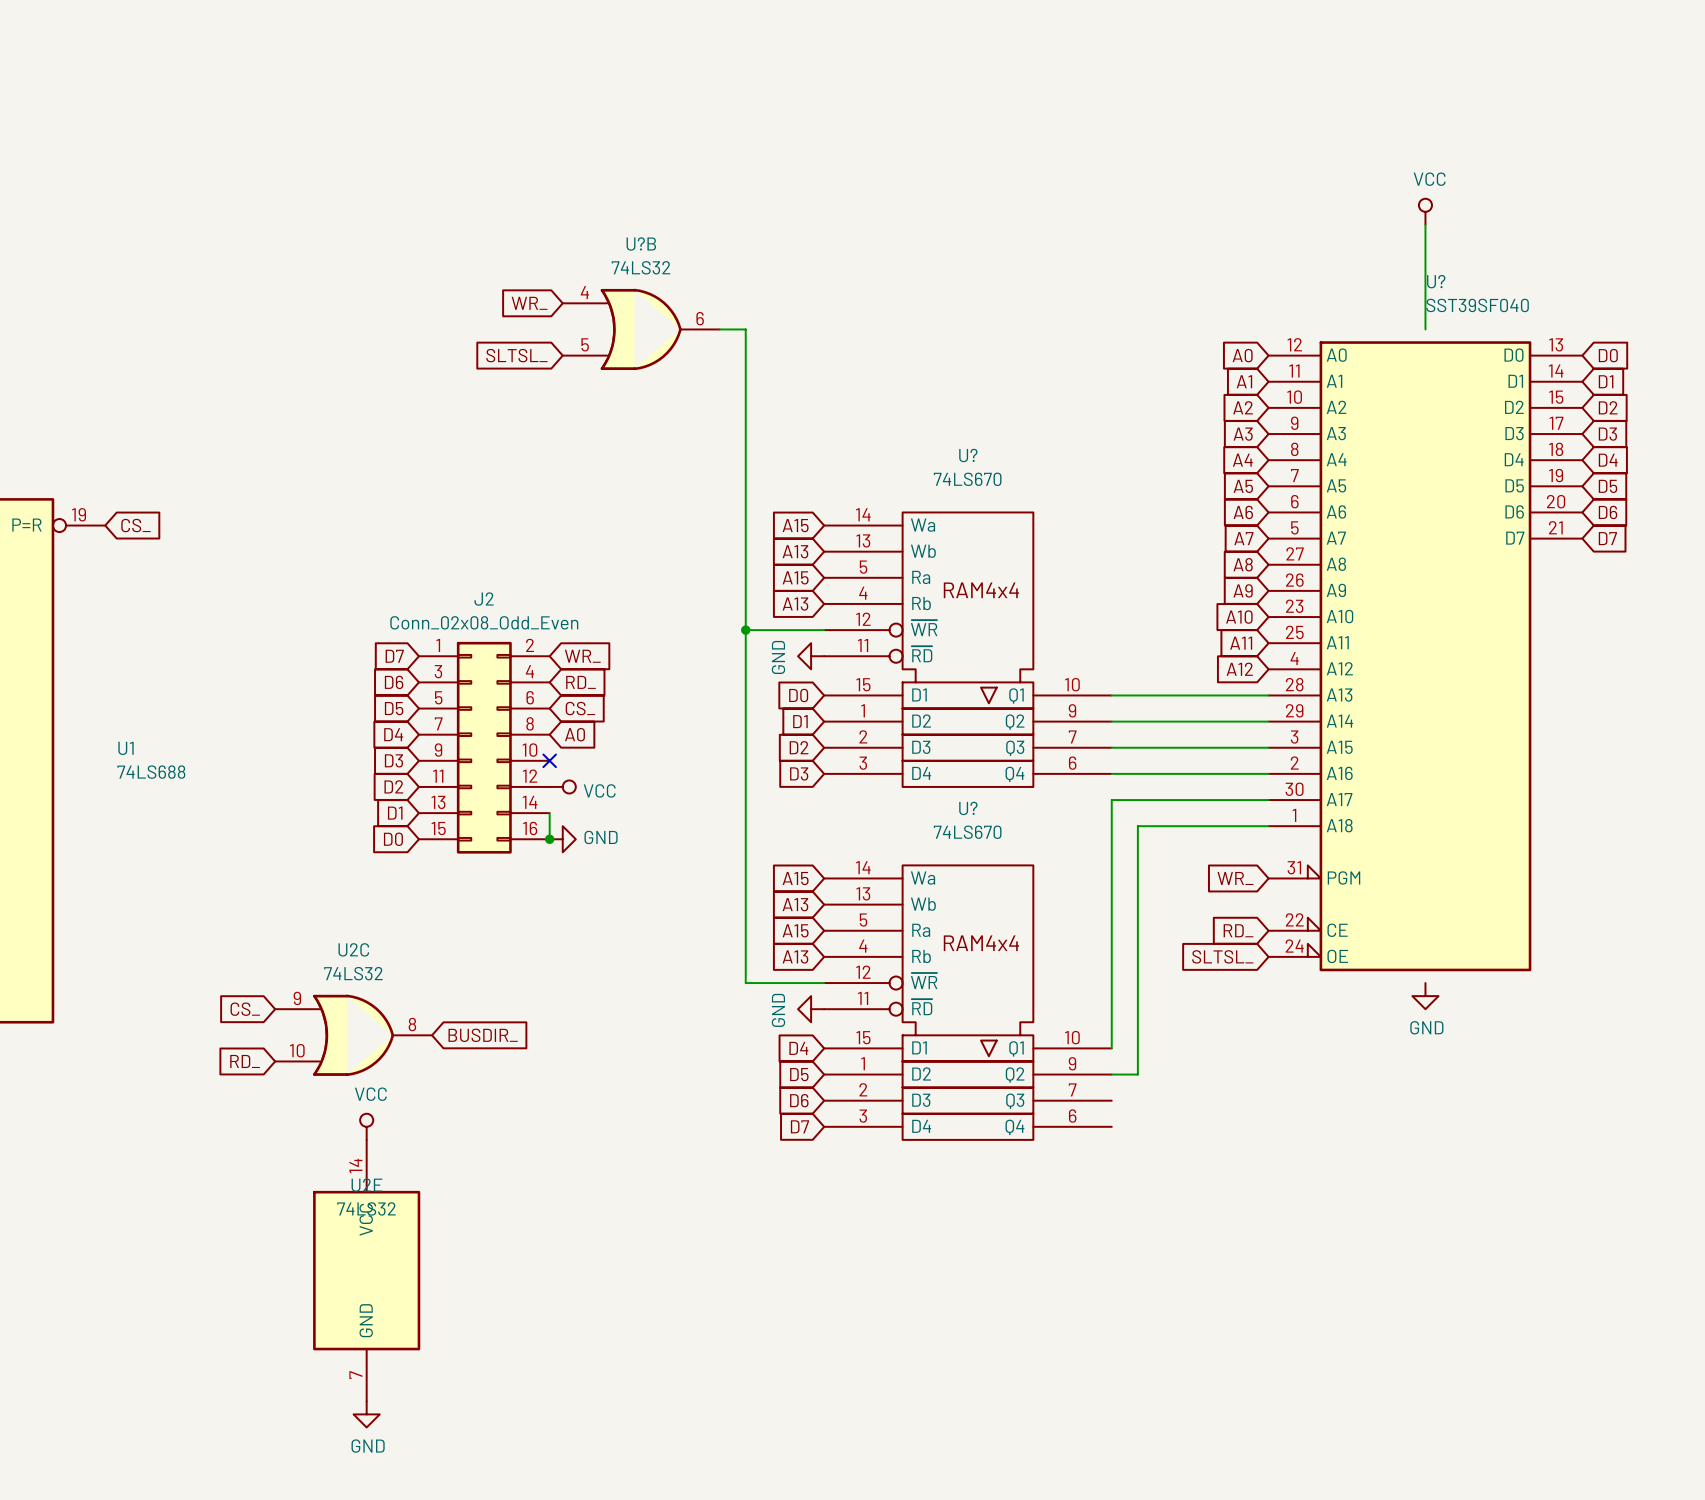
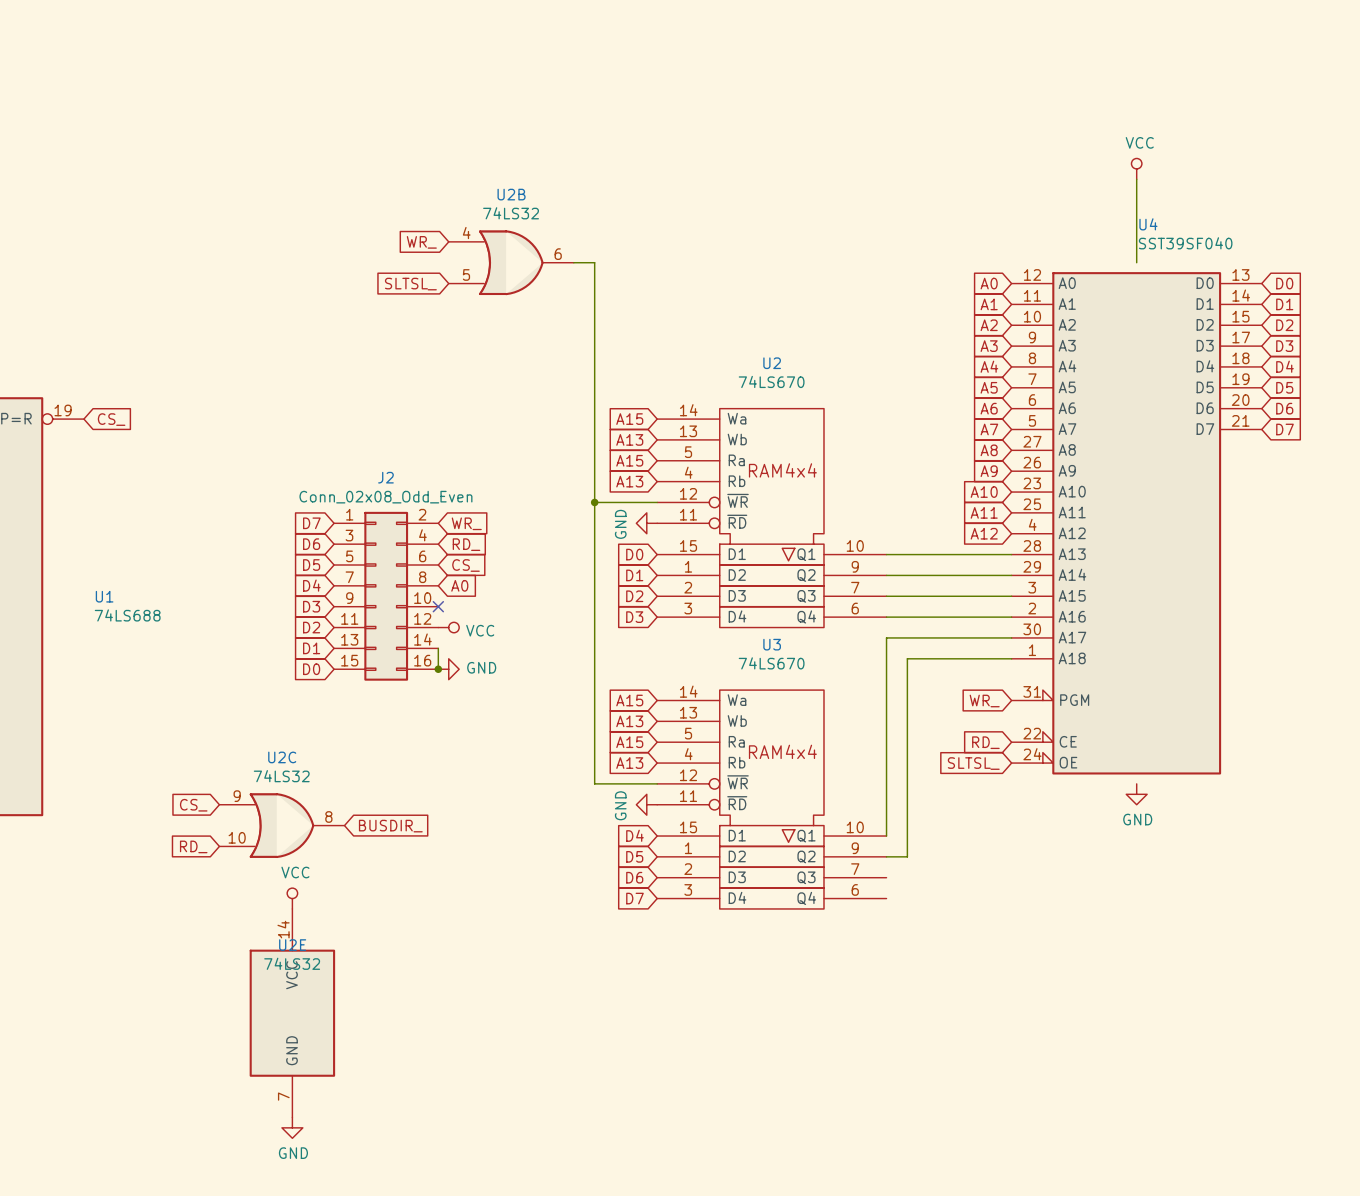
U?B name: U?B (641, 244) -> U2B (511, 194)
U? name: U? (1436, 281) -> U4 (1148, 224)
U? name: U? (968, 455) -> U2 (772, 363)
U? name: U? (968, 808) -> U3 (772, 644)

